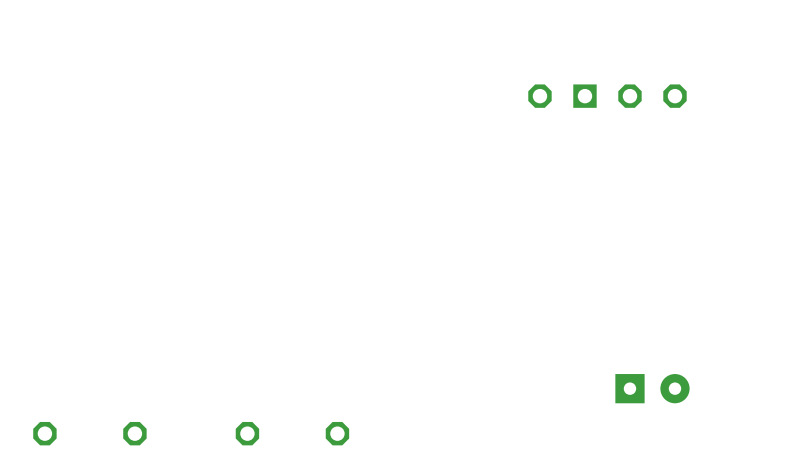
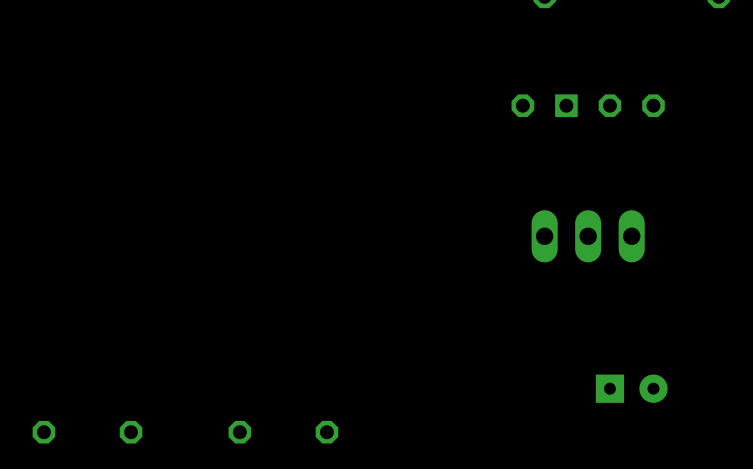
part: none -> (588, 236)

